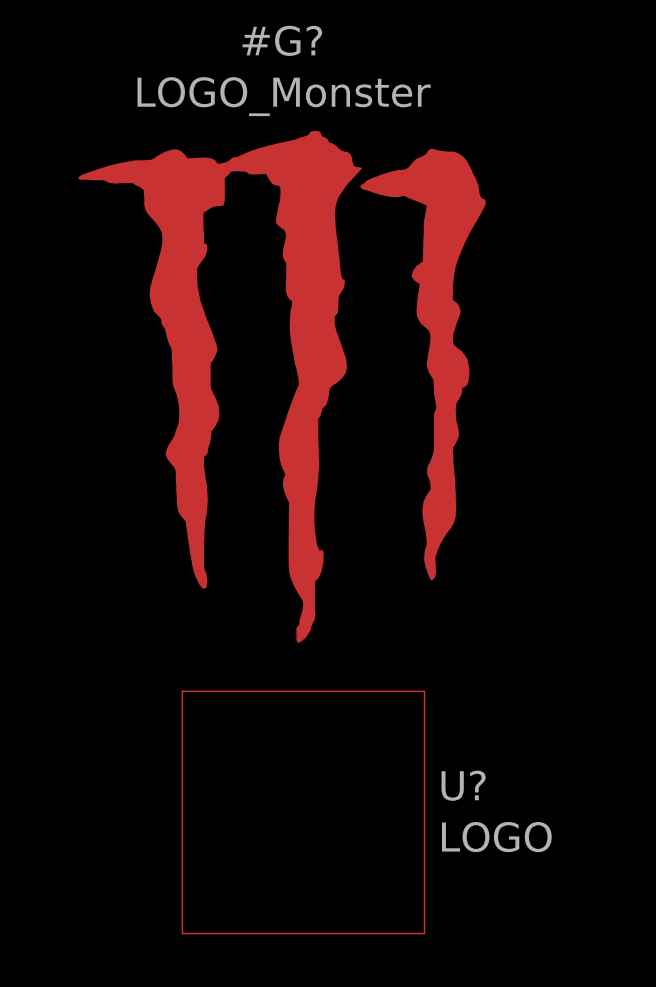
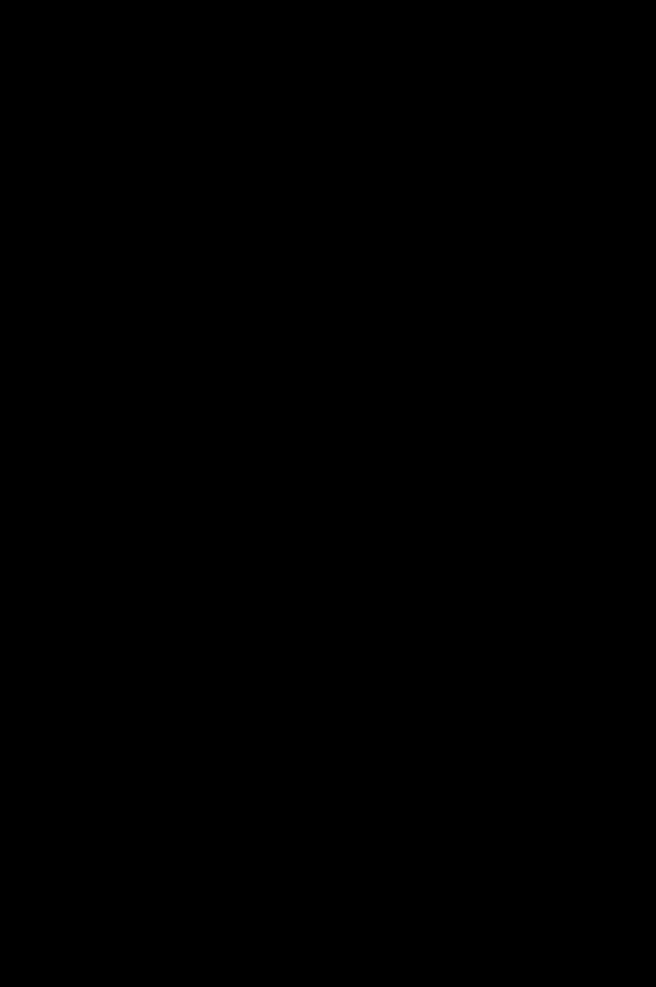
#G?: LOGO_Monster (282, 386) -> none
U?: LOGO (303, 812) -> none

